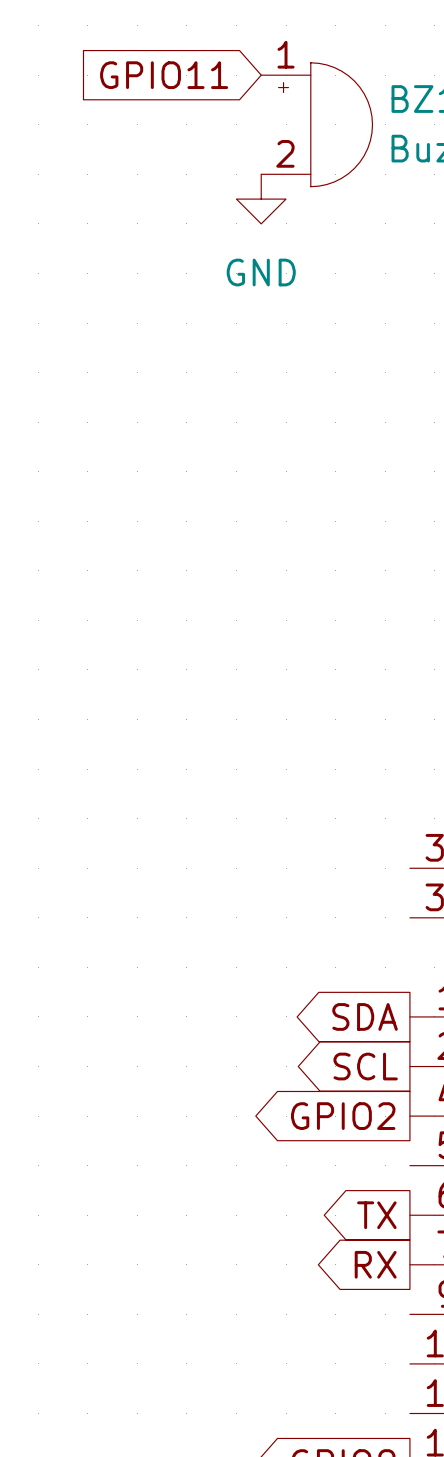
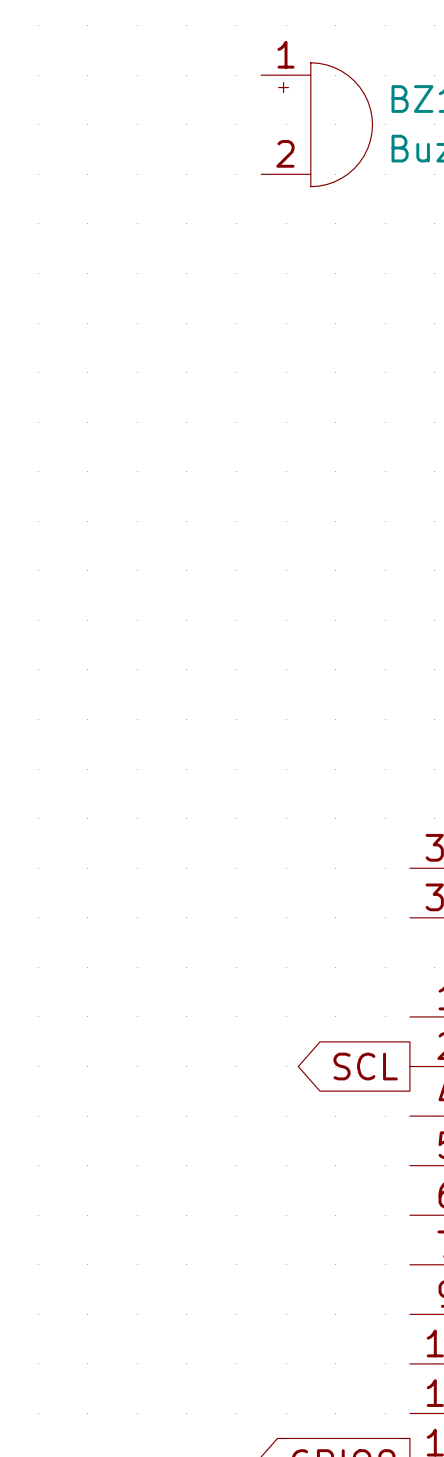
global label: GPIO11 (164, 75) -> none
power symbol: GND (261, 199) -> none
global label: SDA (365, 1016) -> none
global label: GPIO2 (343, 1116) -> none
global label: TX (376, 1215) -> none
global label: RX (375, 1264) -> none

